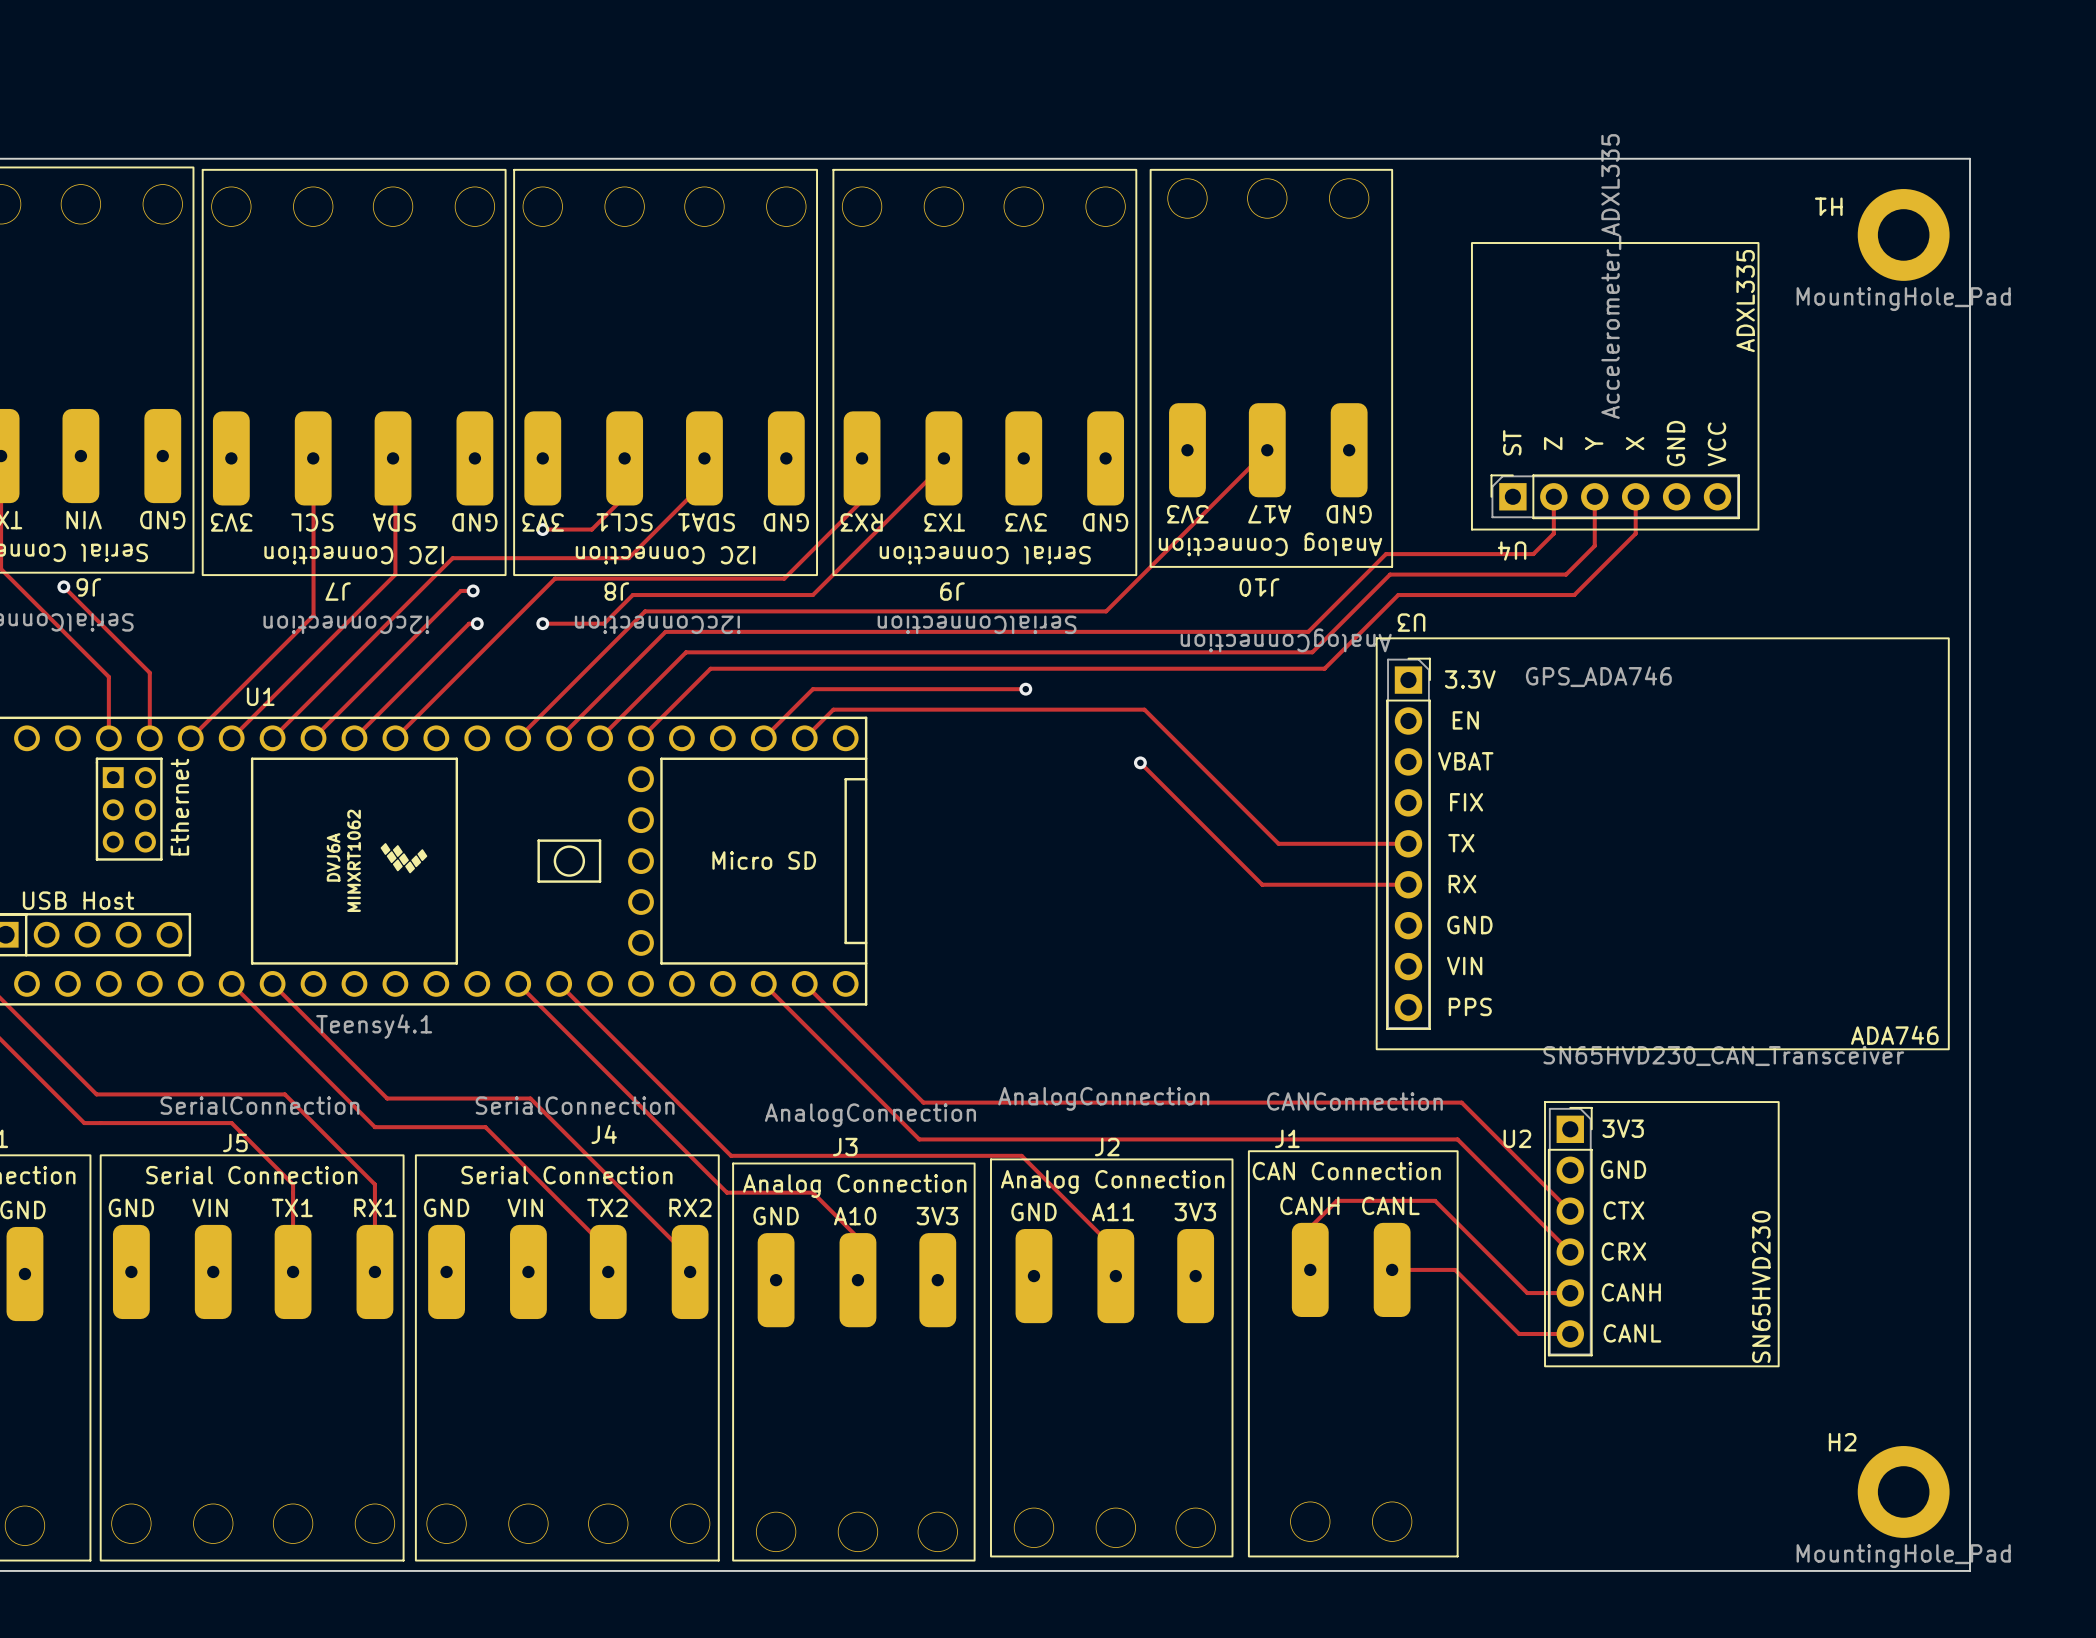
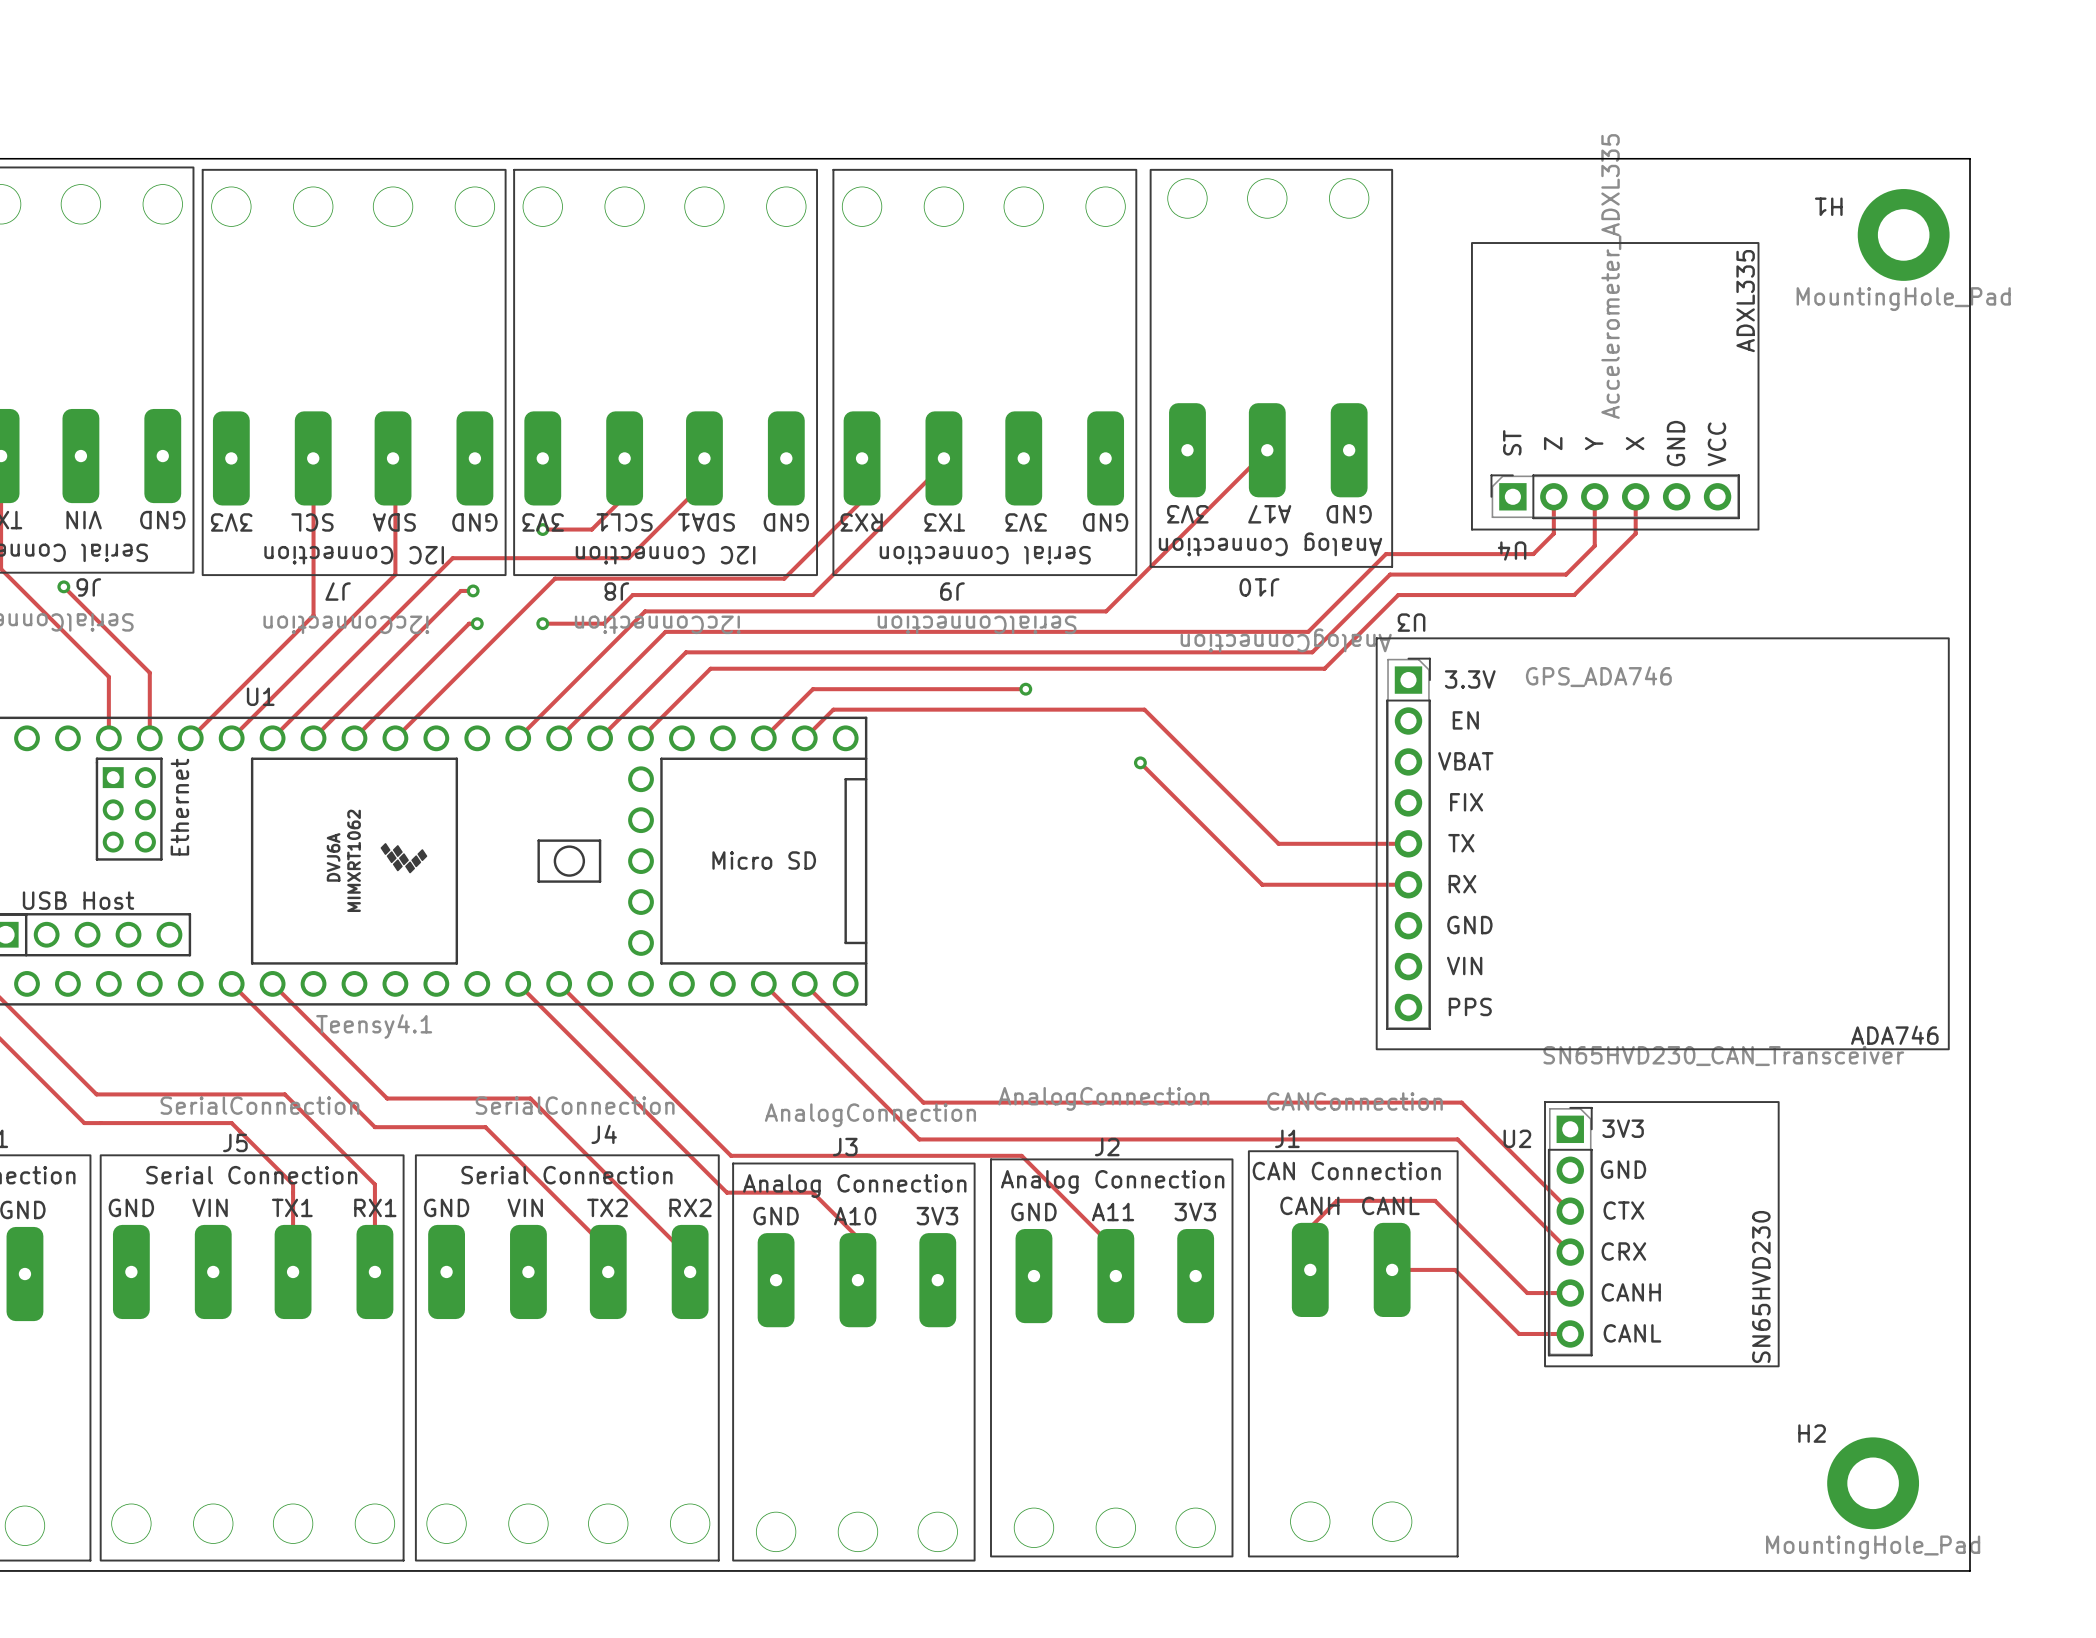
H2 position: (1903, 1491) -> (1873, 1483)

